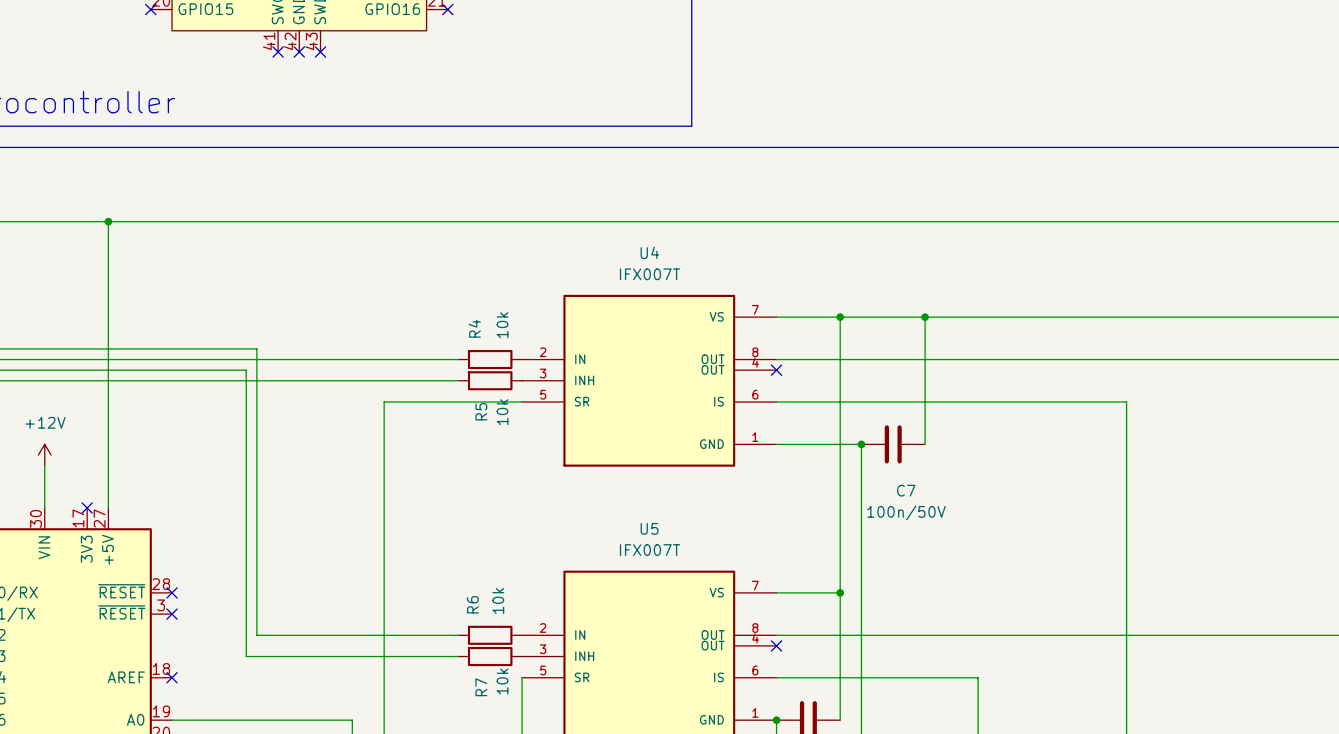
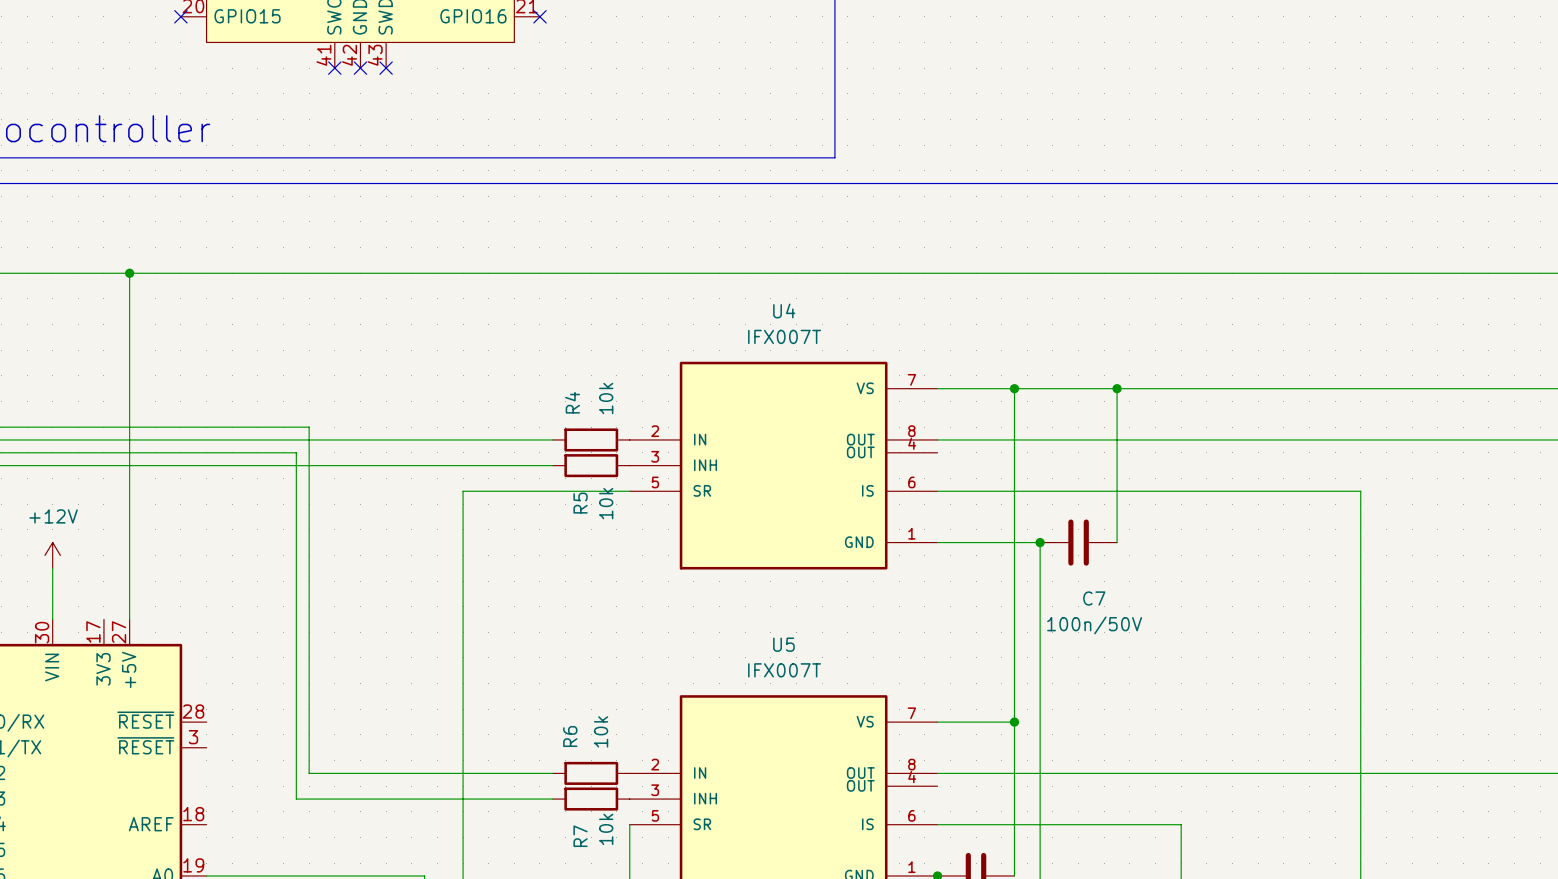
no-connect mark: (776, 370) -> none
no-connect mark: (87, 508) -> none
no-connect mark: (172, 592) -> none
no-connect mark: (172, 614) -> none
no-connect mark: (776, 645) -> none
no-connect mark: (172, 677) -> none

